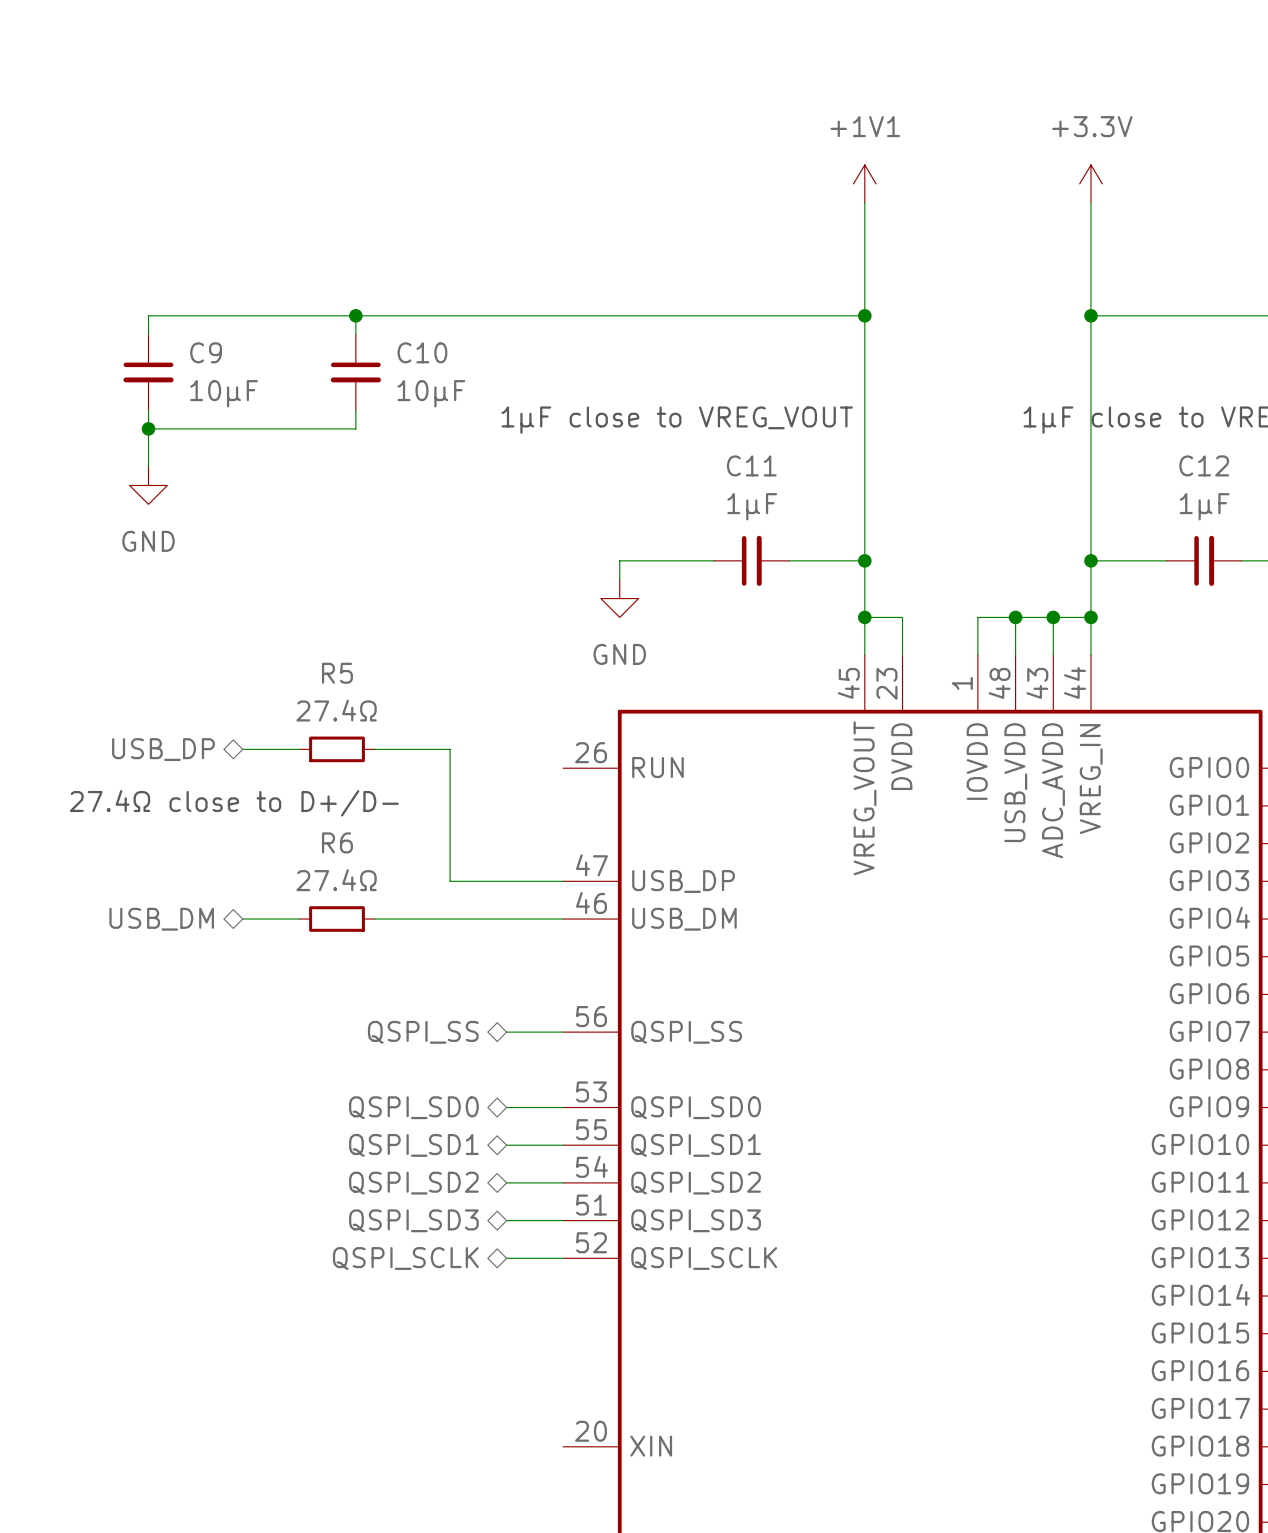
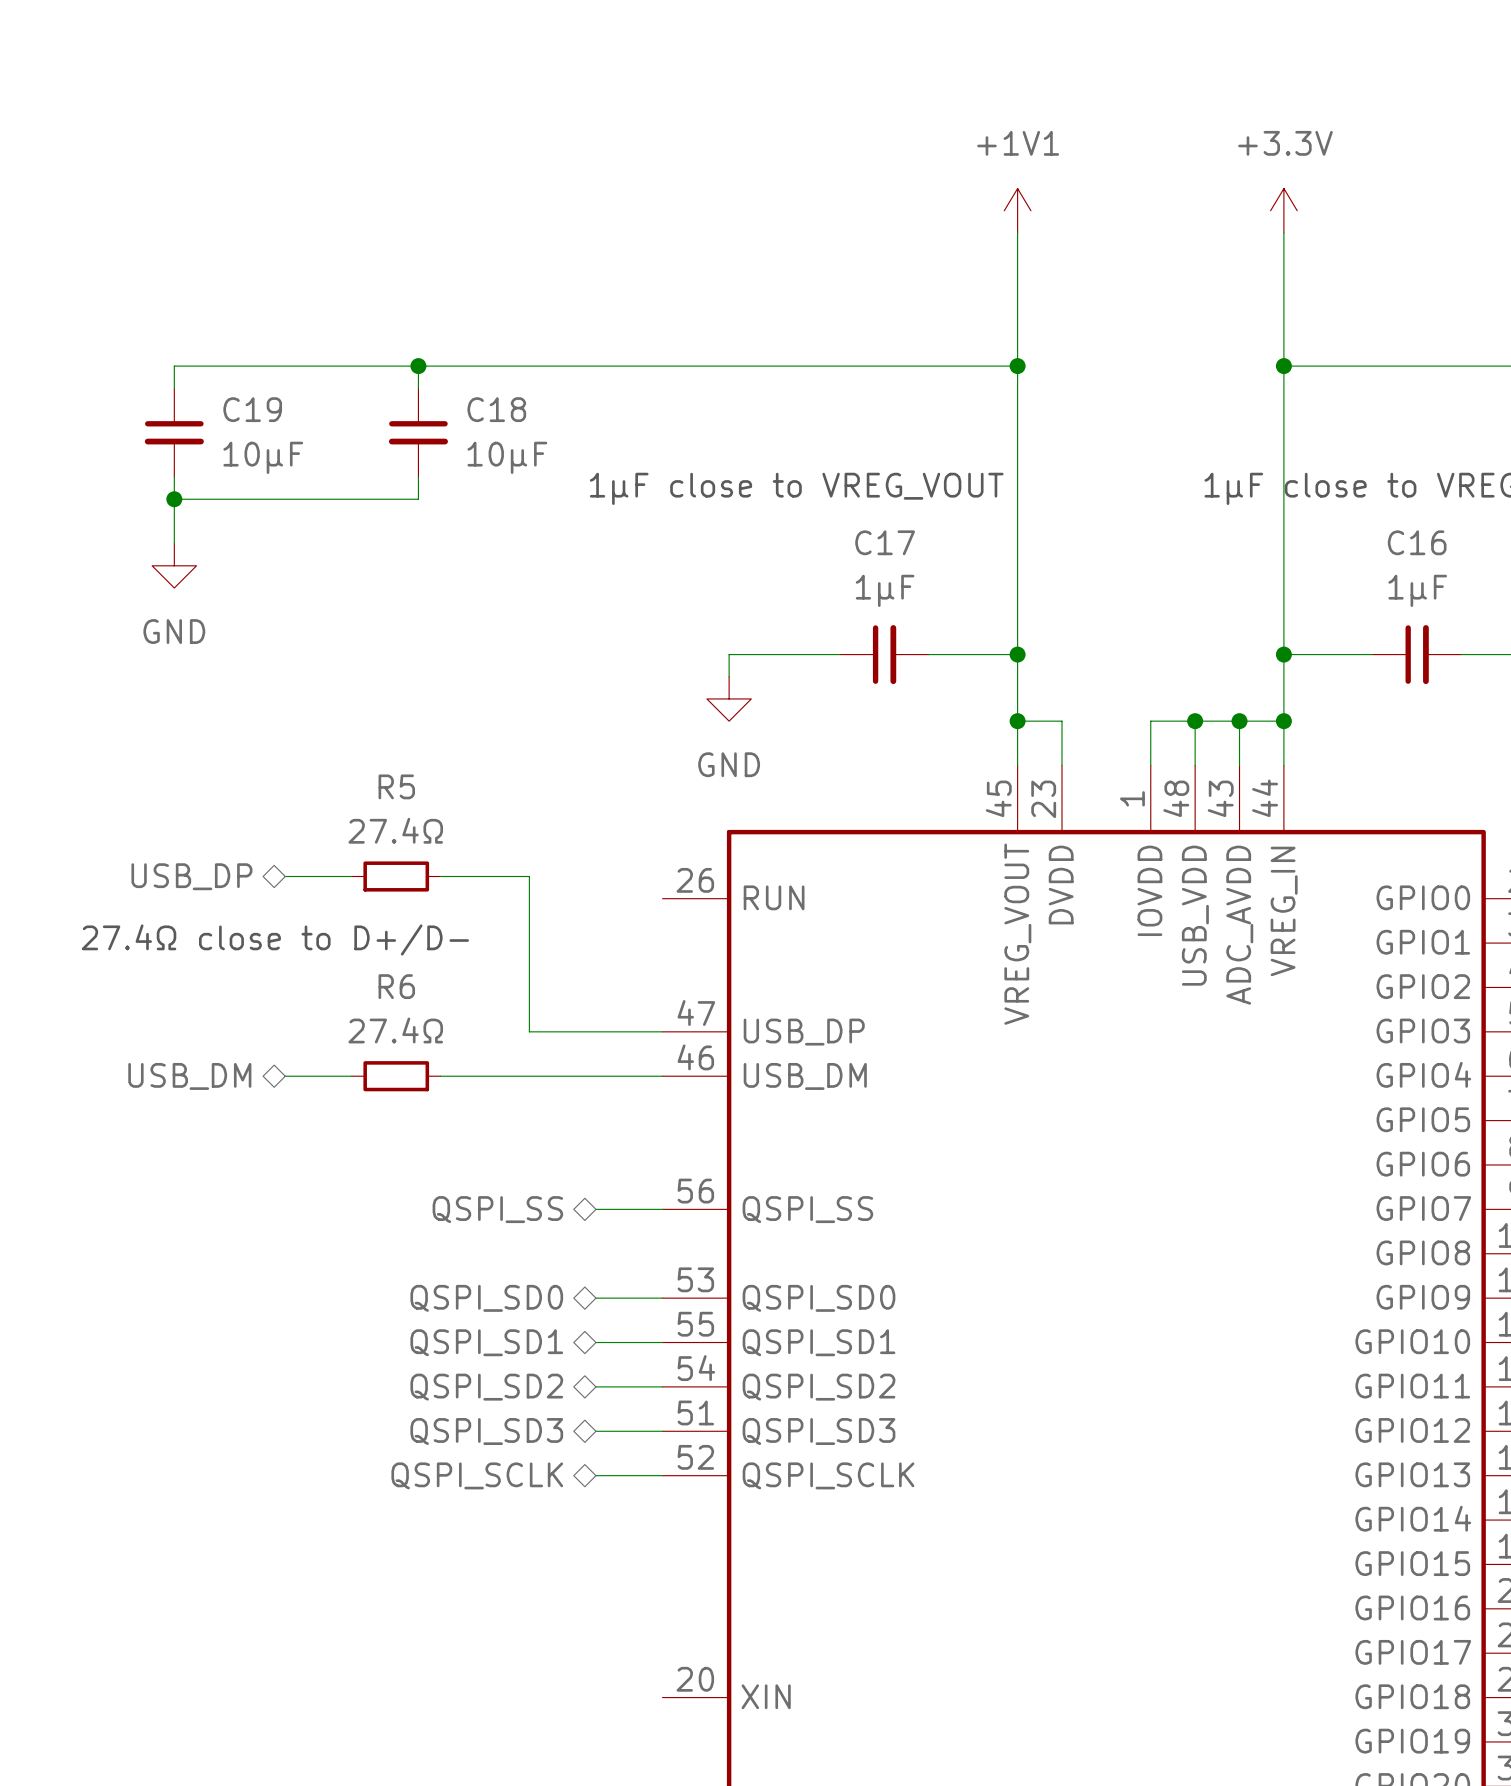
C9 name: C9 (206, 352) -> C19 (252, 409)
C10 name: C10 (422, 352) -> C18 (496, 409)
C11 name: C11 (751, 465) -> C17 (885, 542)
C12 name: C12 (1204, 465) -> C16 (1417, 542)

